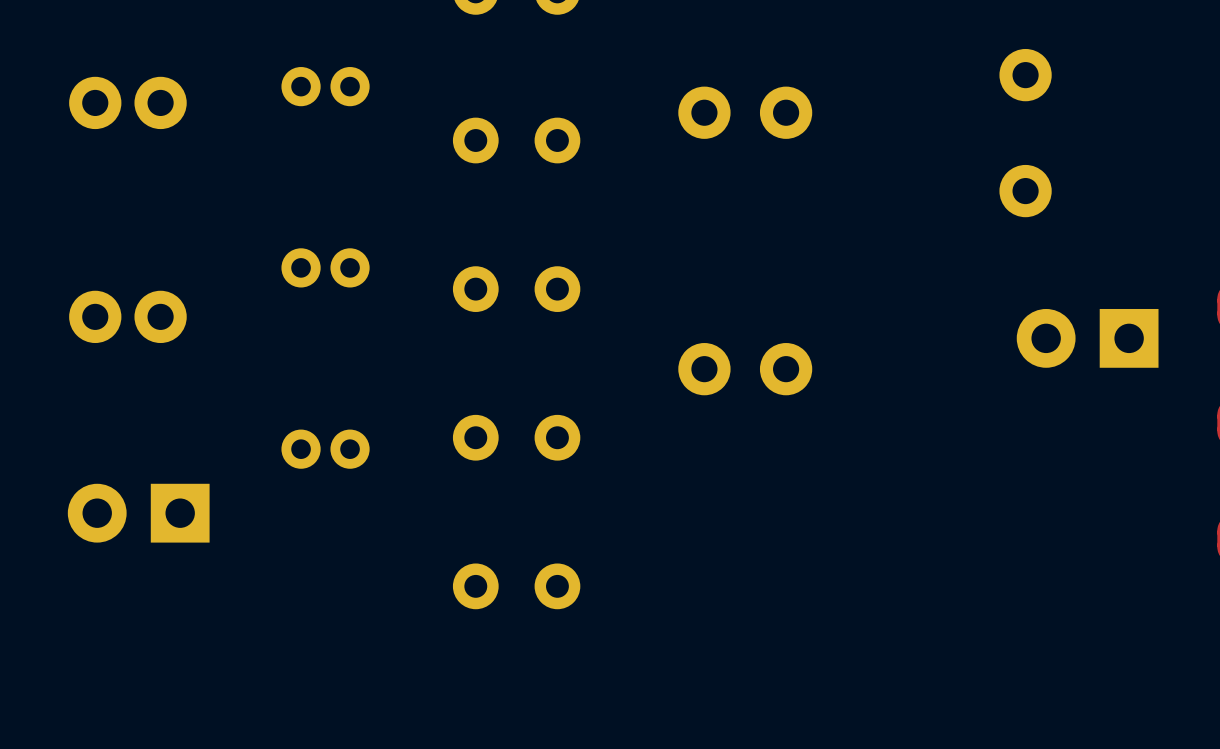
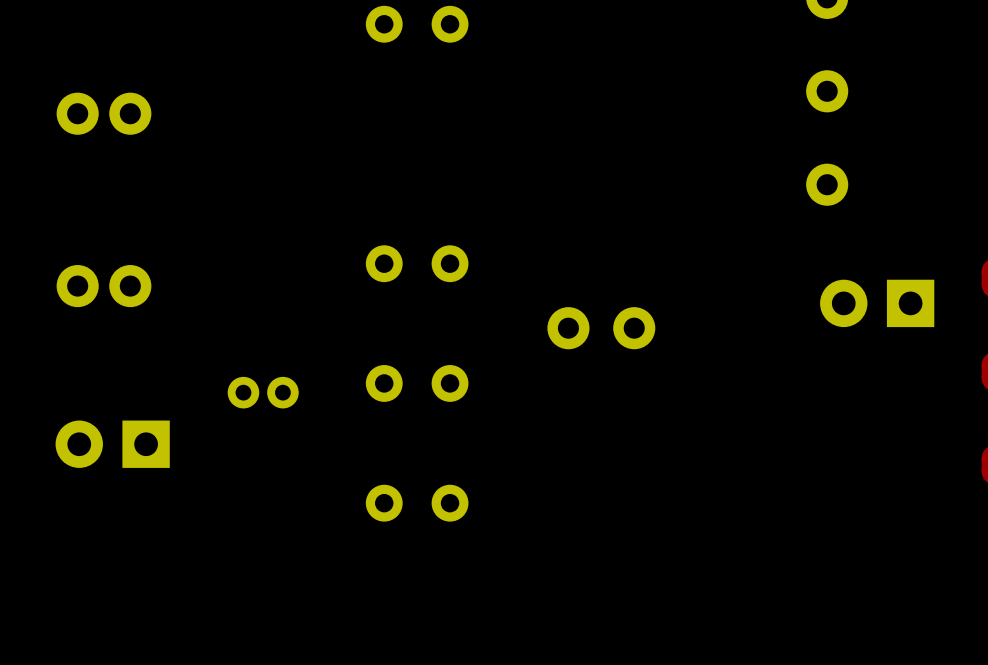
part: (325, 86) -> none
part: (745, 112) -> none
part: (516, 140) -> none
part: (325, 267) -> none

